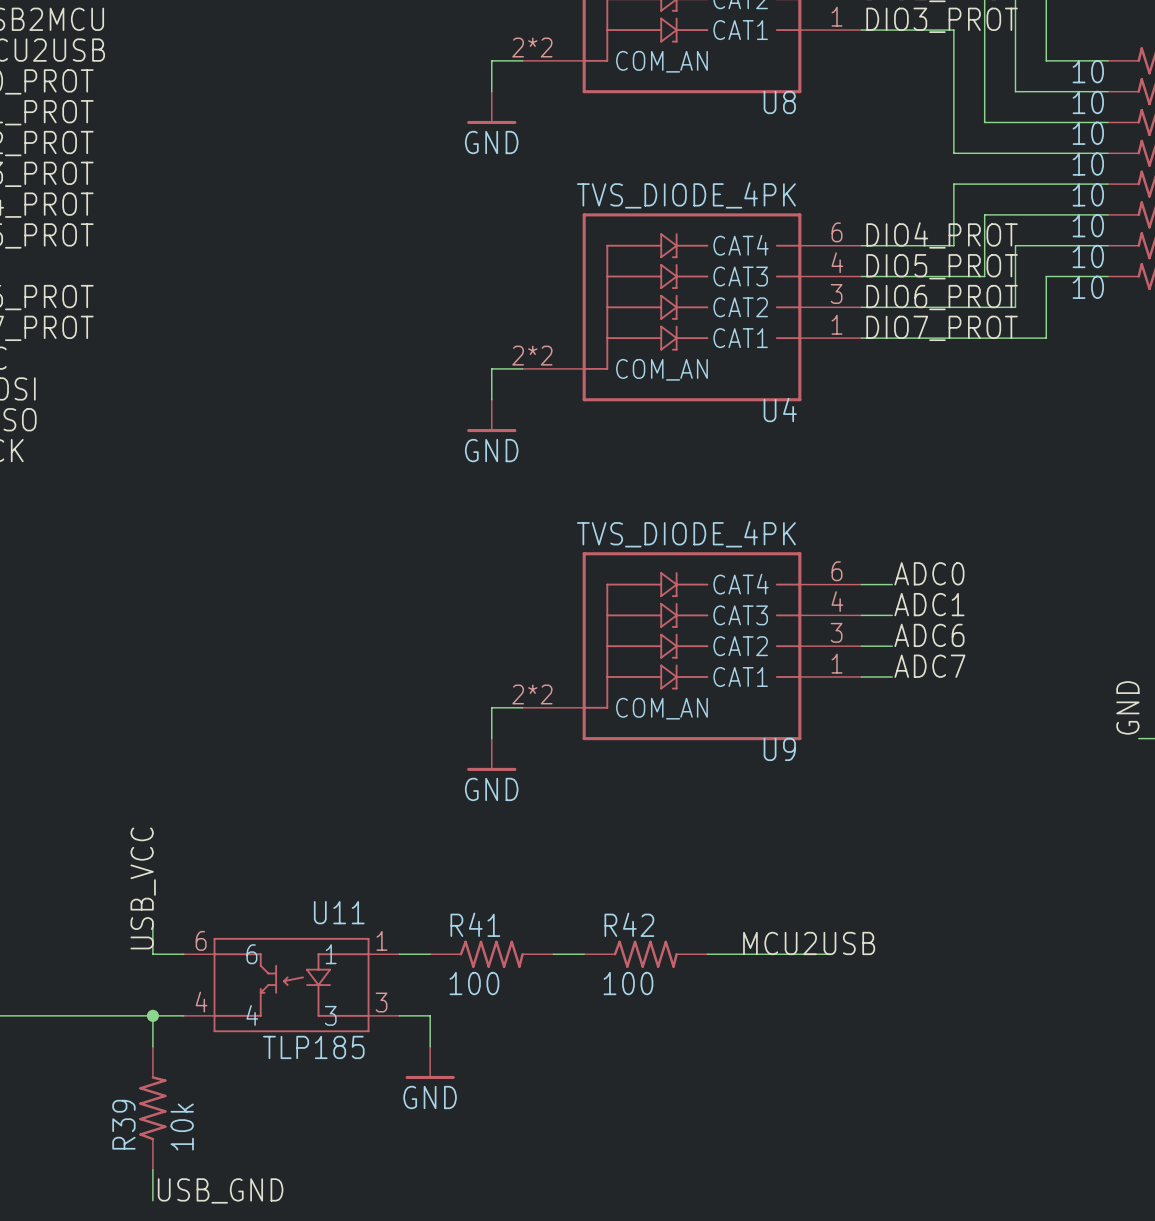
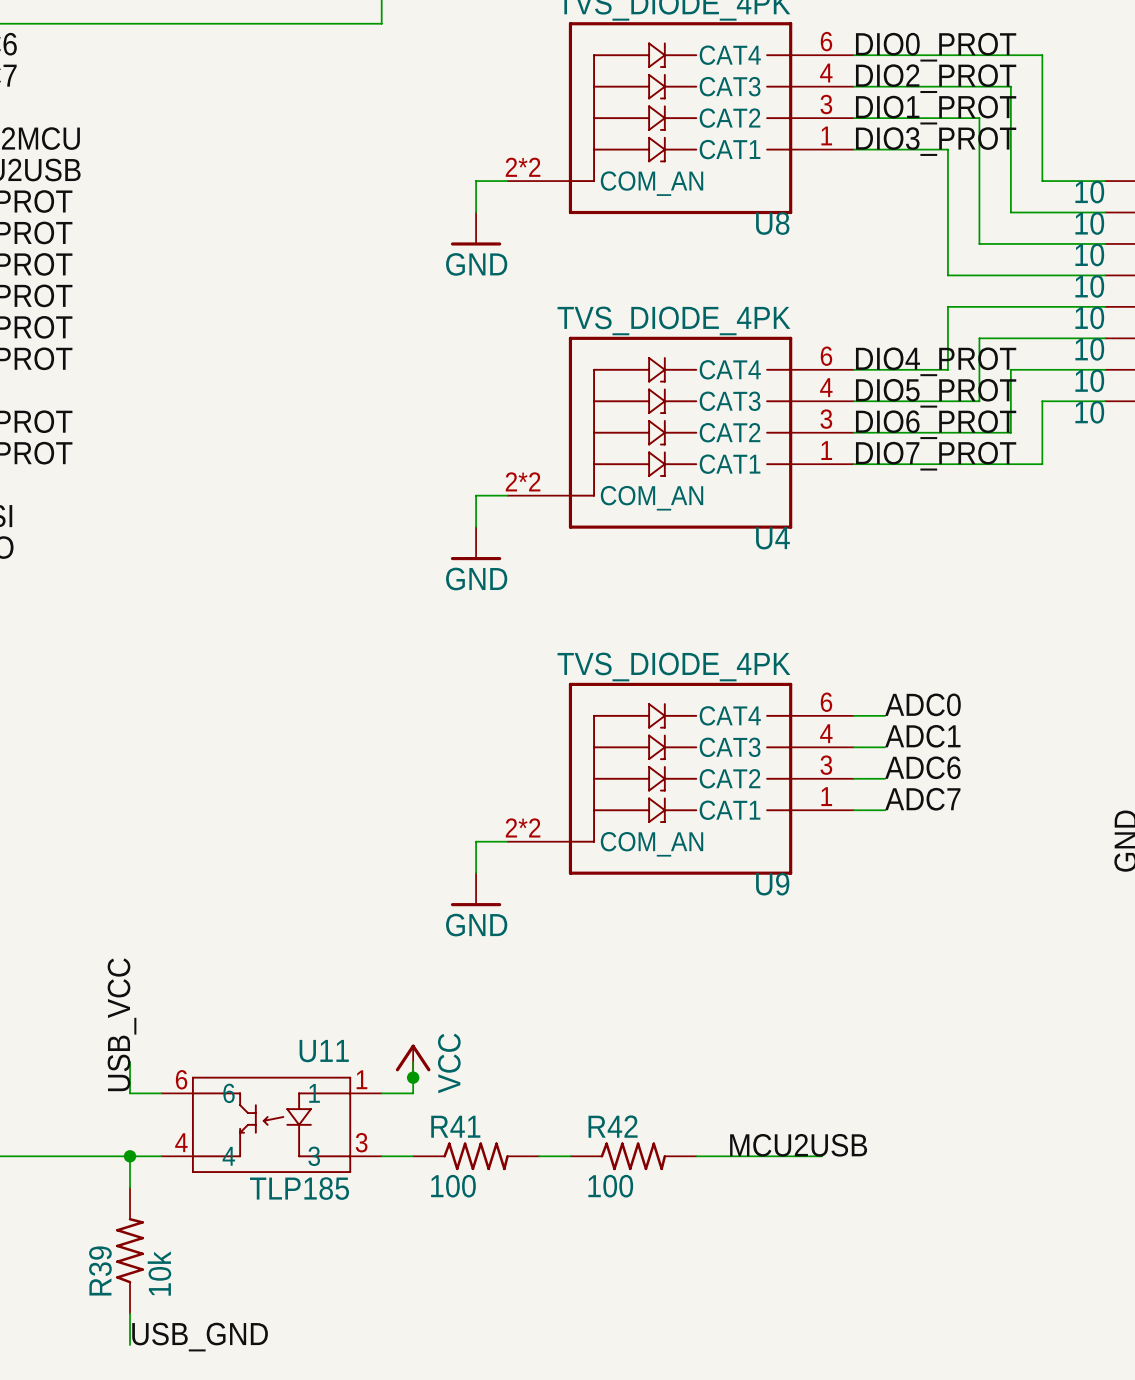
power symbol: none -> VCC (413, 1061)
junction: none -> (413, 1077)
label position: MCU2USB (809, 943) -> MCU2USB (798, 1145)
R41 position: (491, 954) -> (476, 1156)
wire: (553, 954) (584, 954) -> (538, 1156) (570, 1156)
R42 position: (645, 954) -> (633, 1156)
wire: (707, 954) (830, 954) -> (696, 1156) (822, 1156)
wire: (430, 1015) (430, 1046) -> (413, 1061) (413, 1093)
power symbol: GND (430, 1062) -> none

